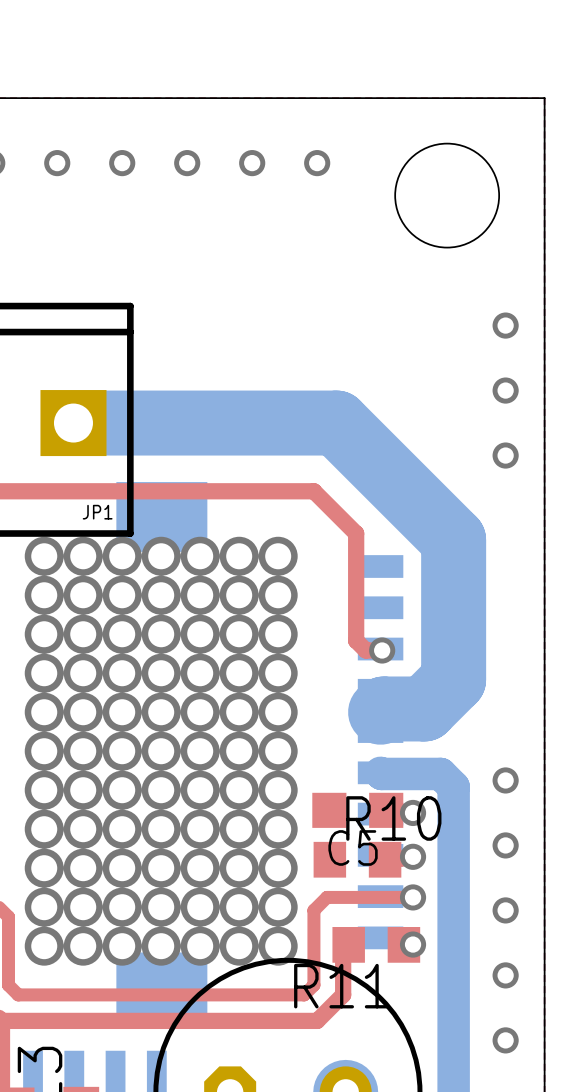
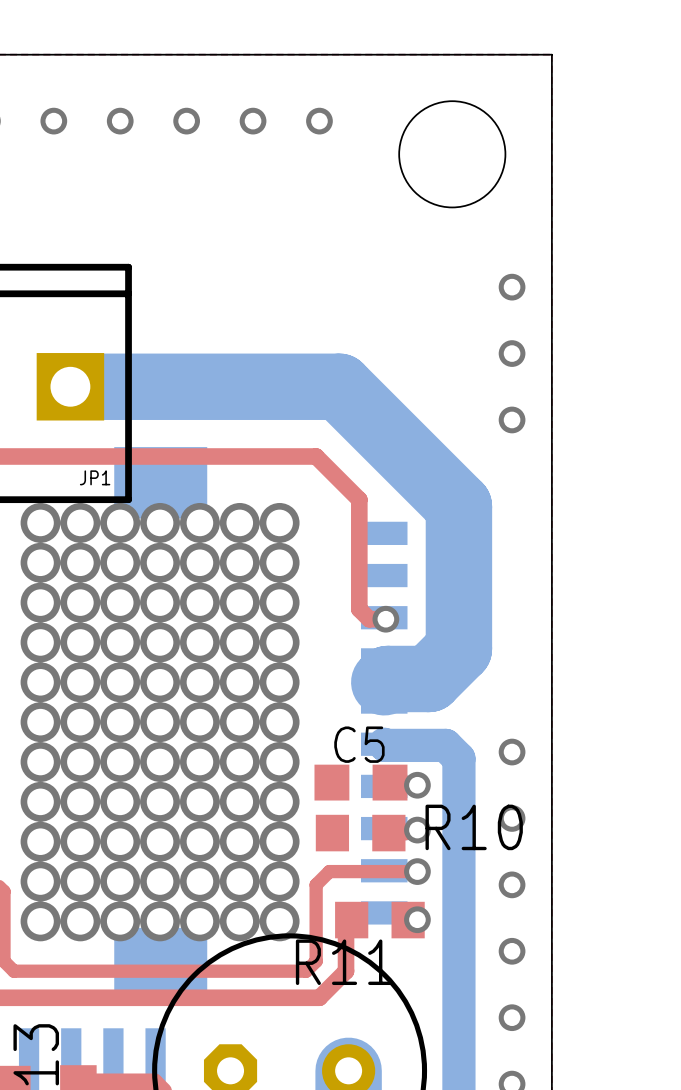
R10 name position: R10 (393, 818) -> R10 (474, 827)
C5 name position: C5 (353, 847) -> C5 (359, 744)

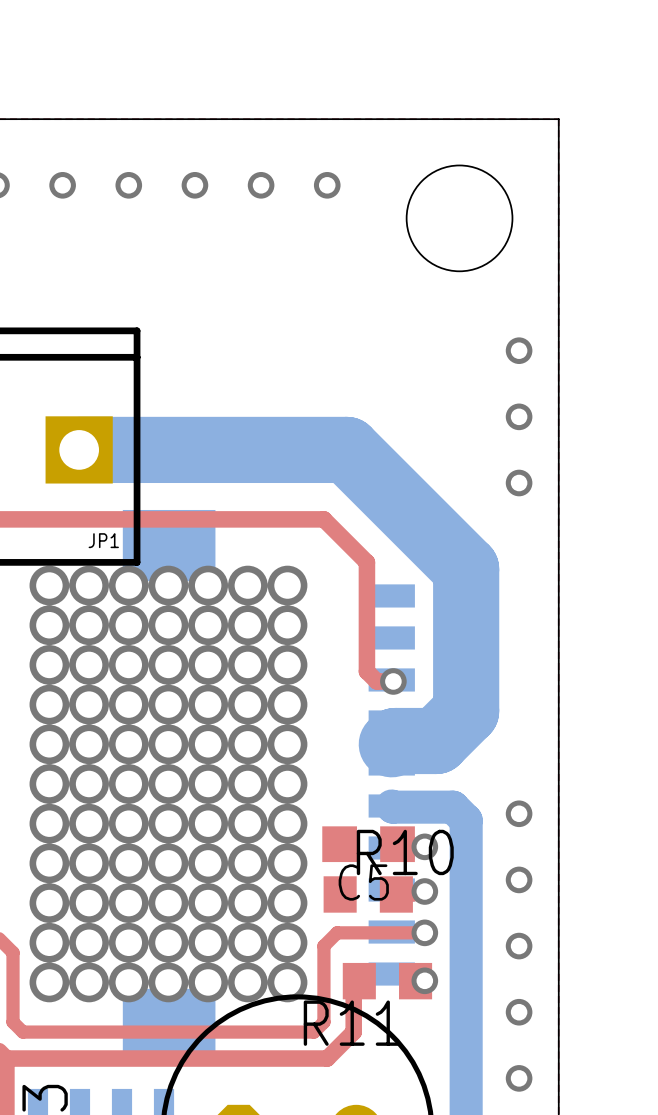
C5 name position: C5 (359, 744) -> C5 (363, 882)
R10 name position: R10 (474, 827) -> R10 (405, 852)

